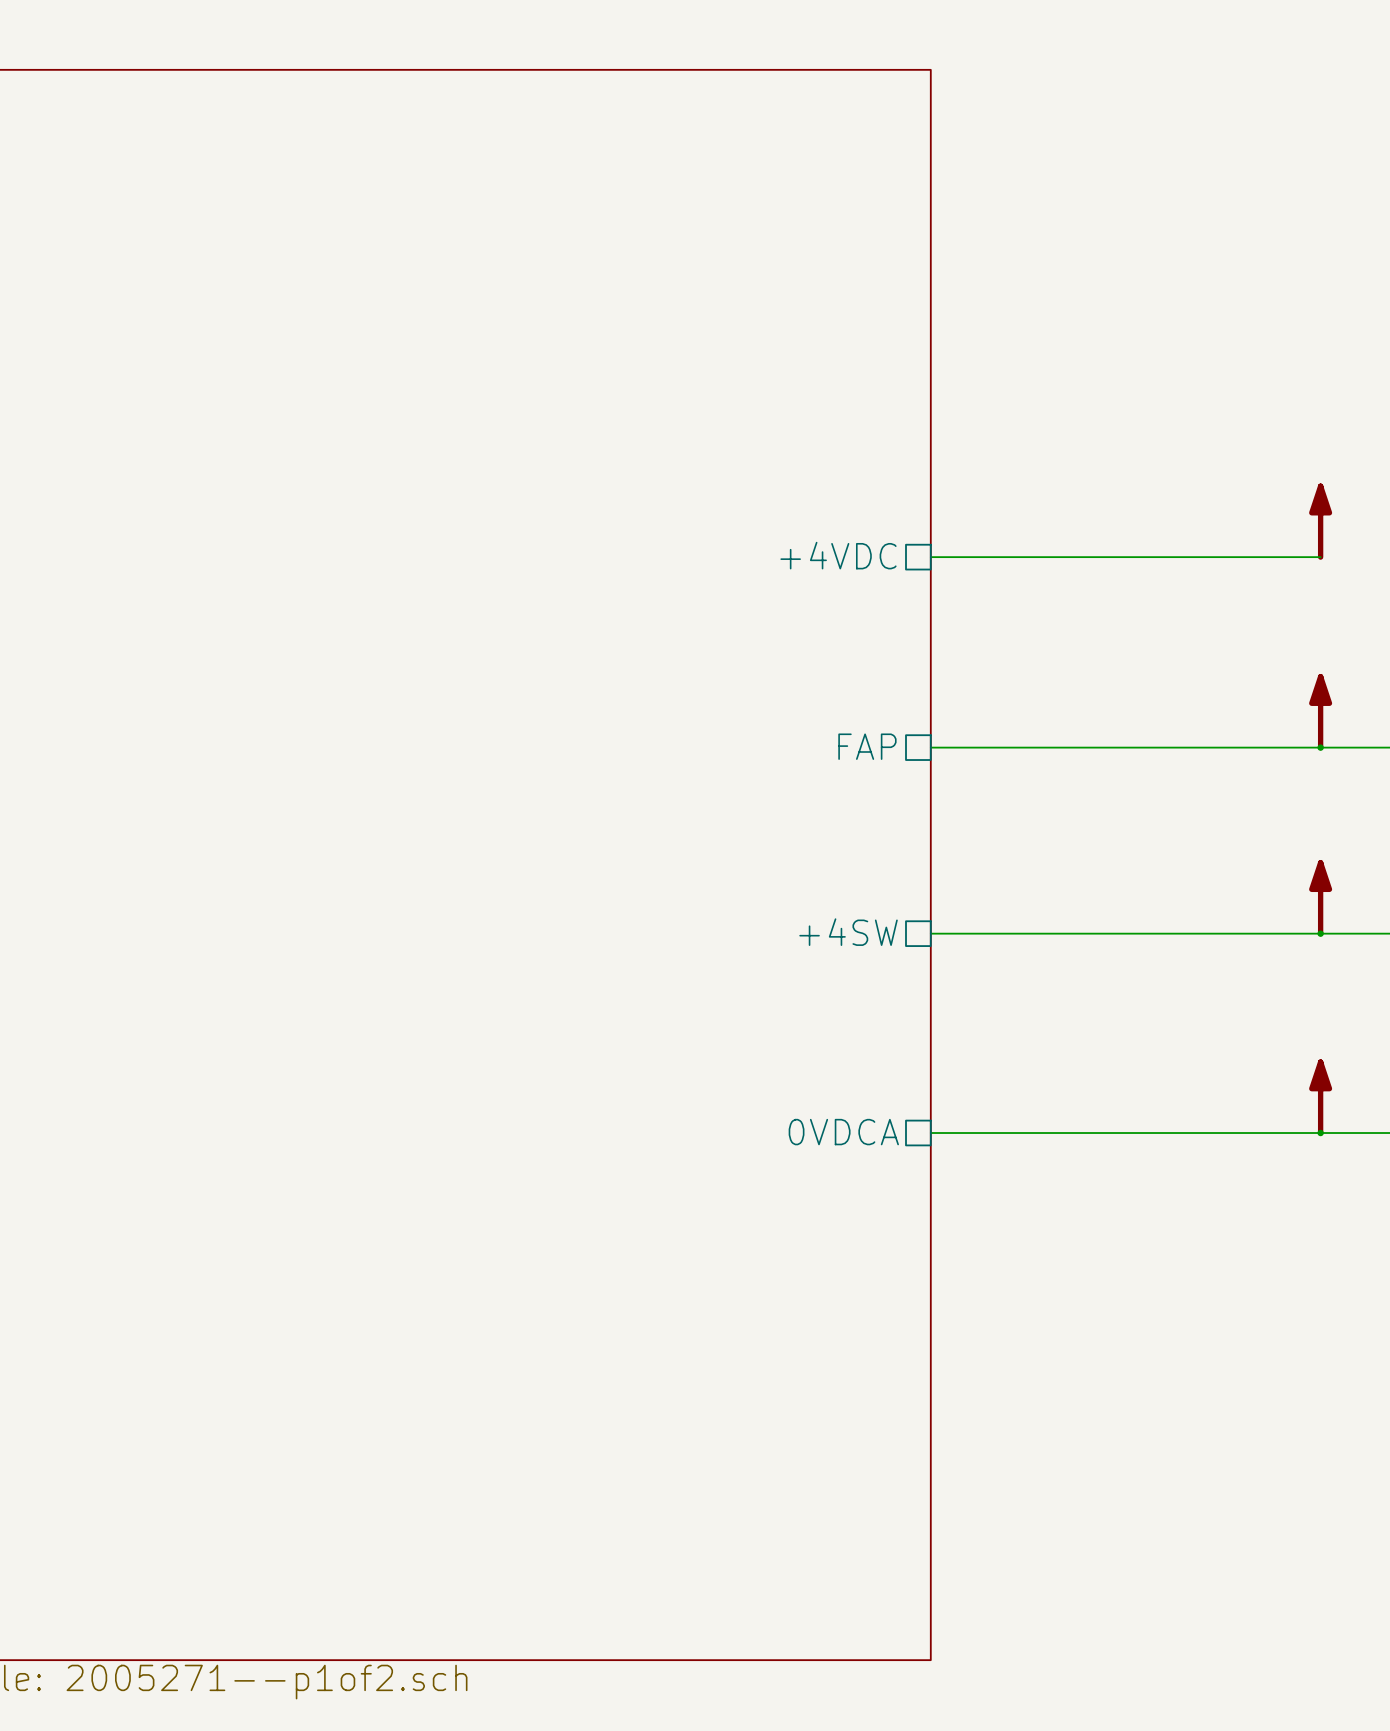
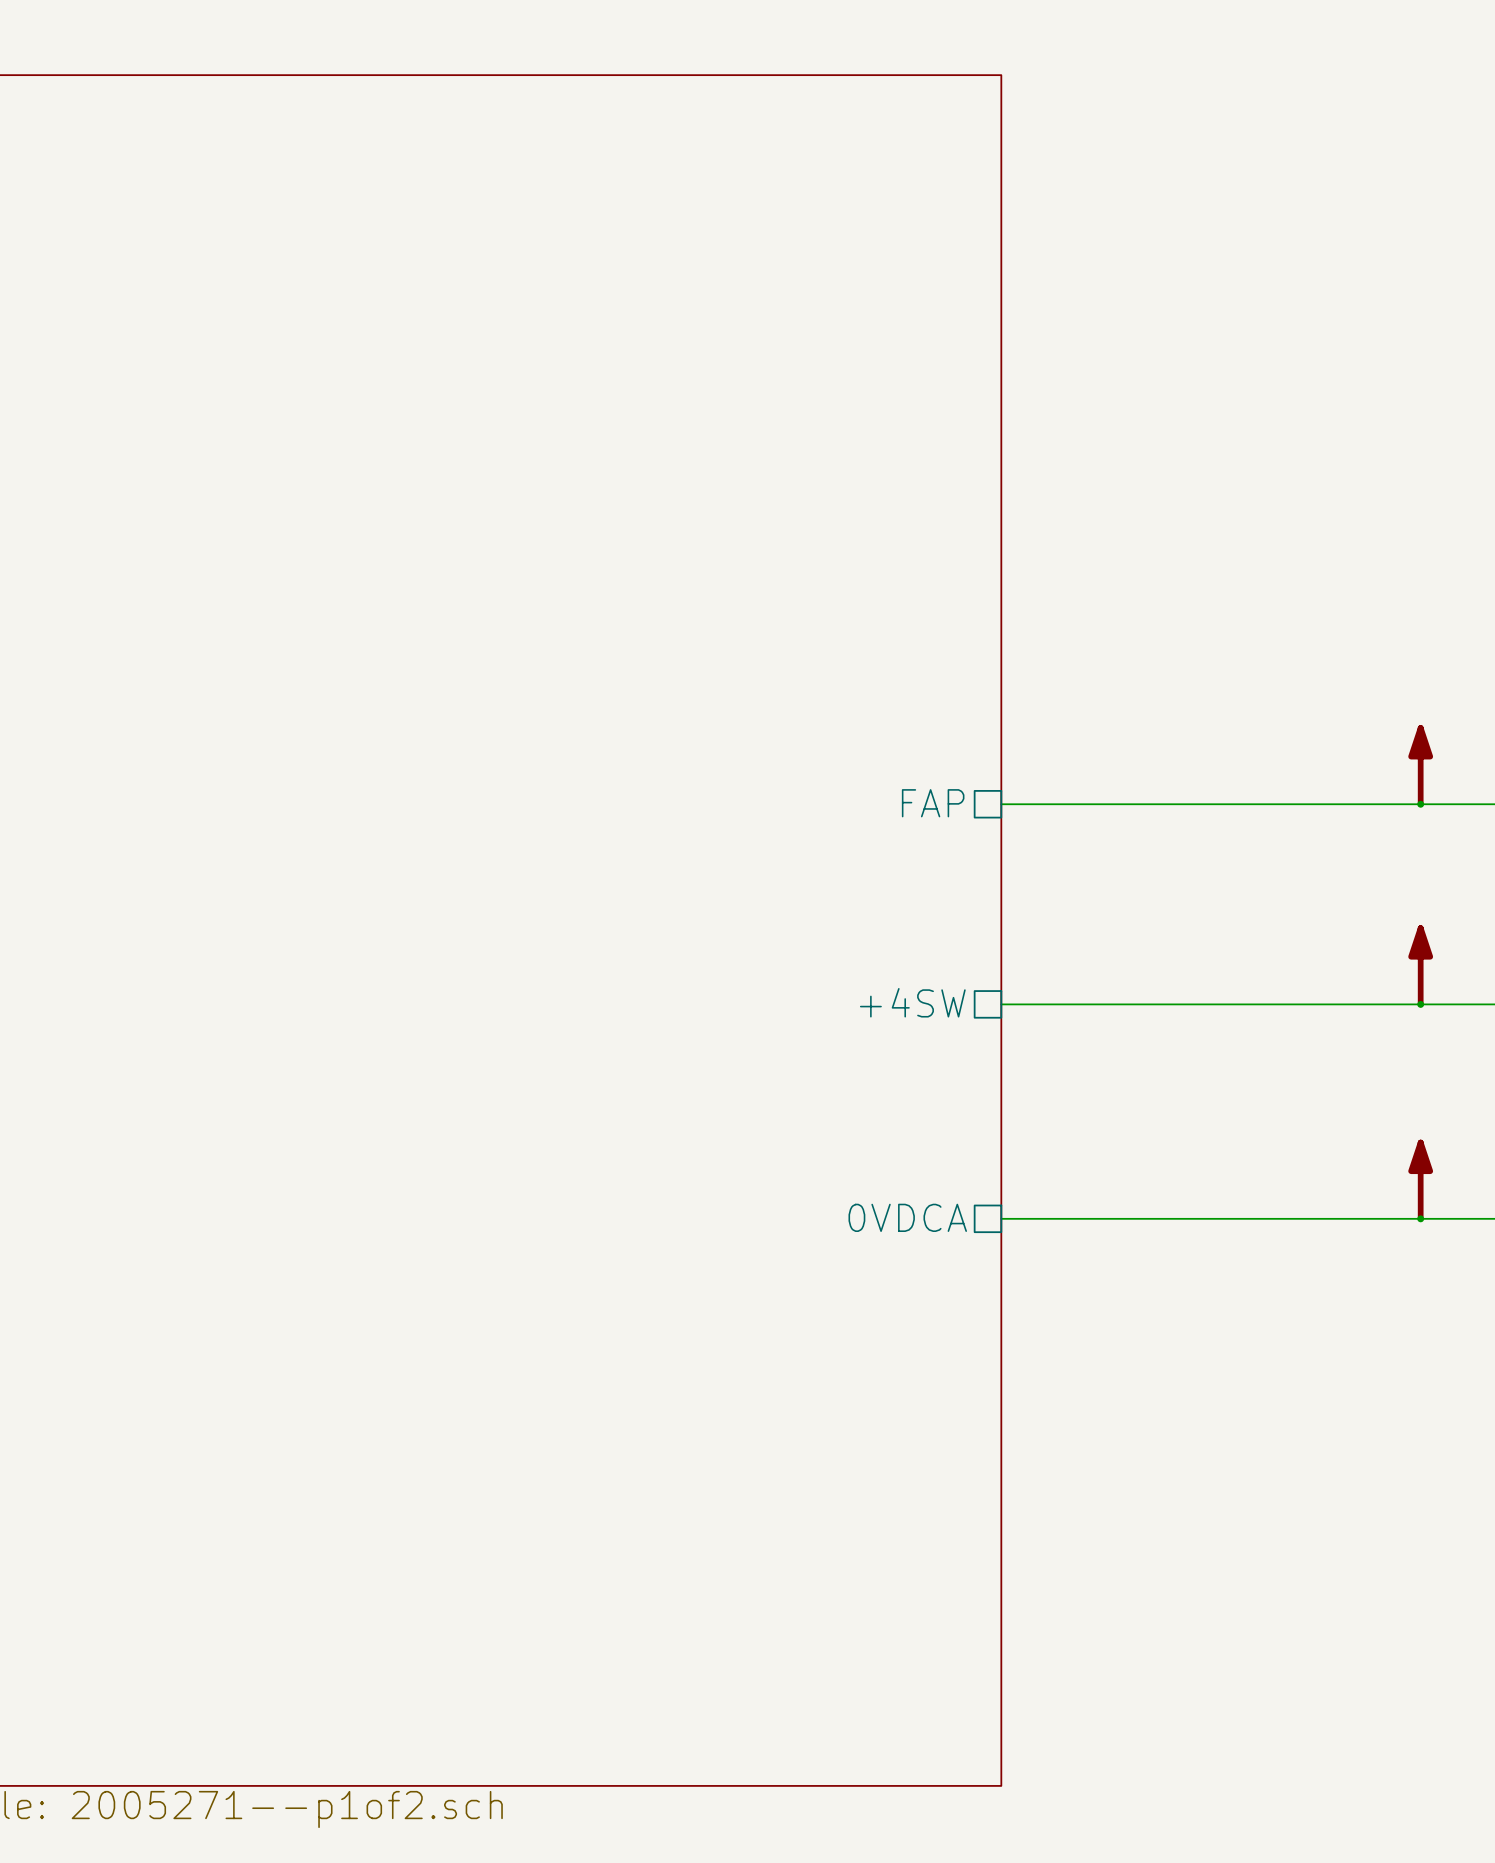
power symbol: (1320, 521) -> none
sheet pin: +4VDC (838, 555) -> none
wire: (930, 557) (1320, 557) -> none

